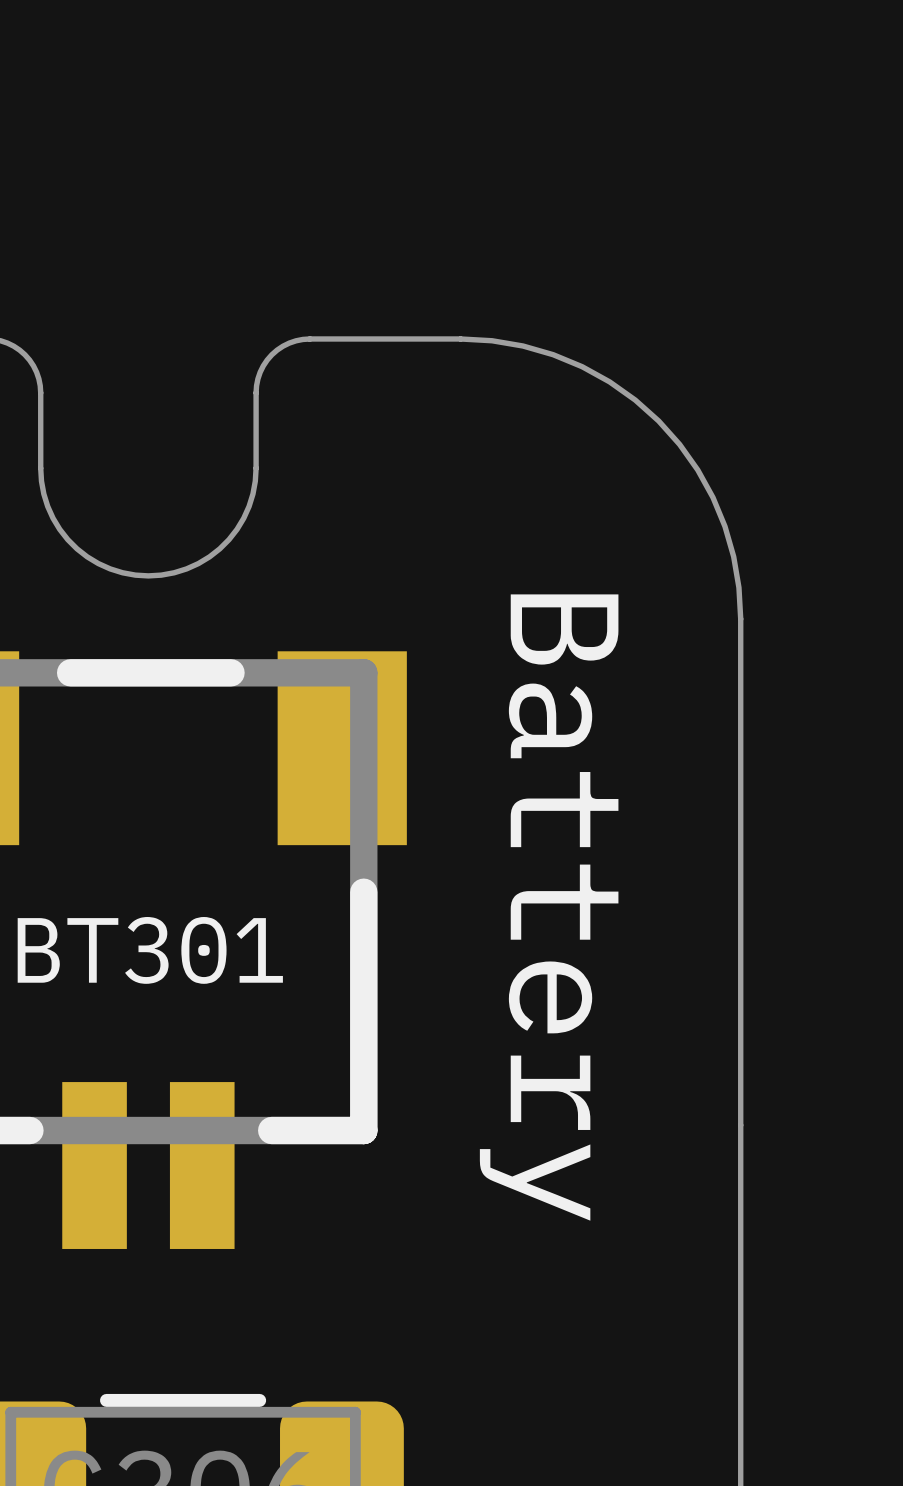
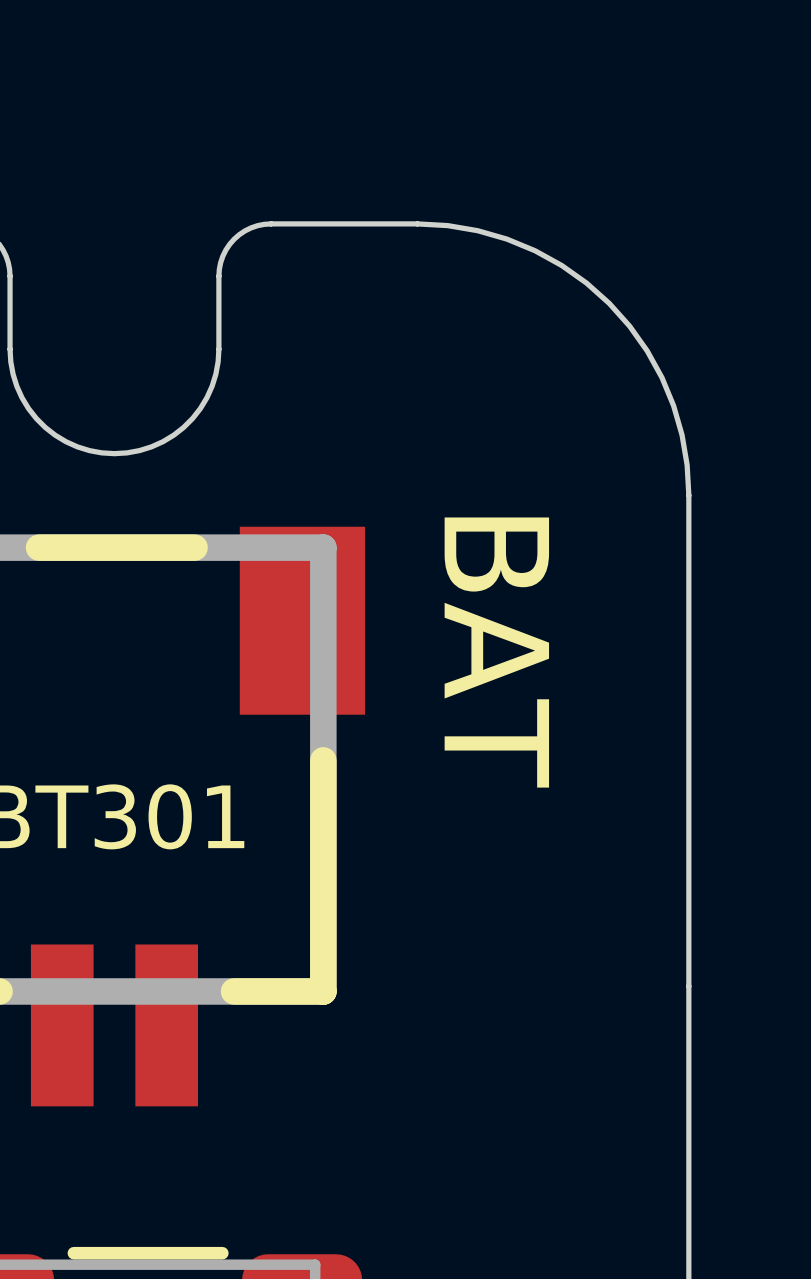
BT301 value: Battery (549, 907) -> BAT (496, 652)

